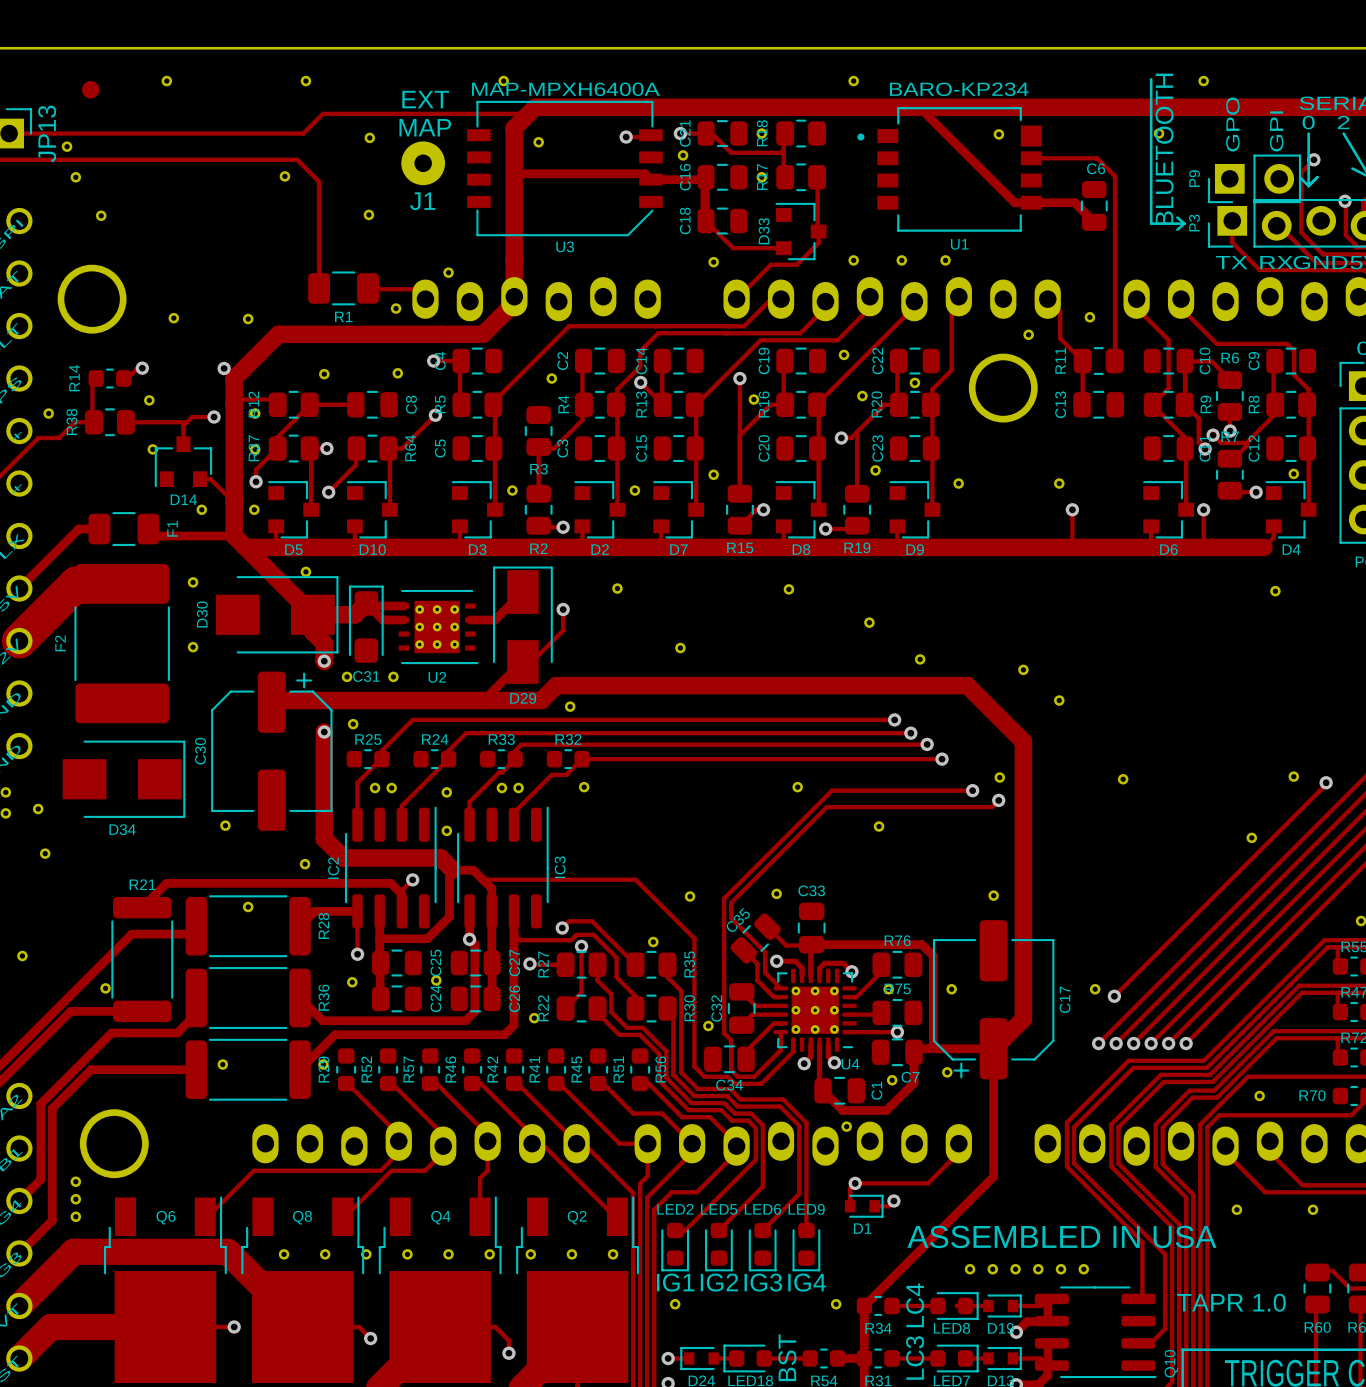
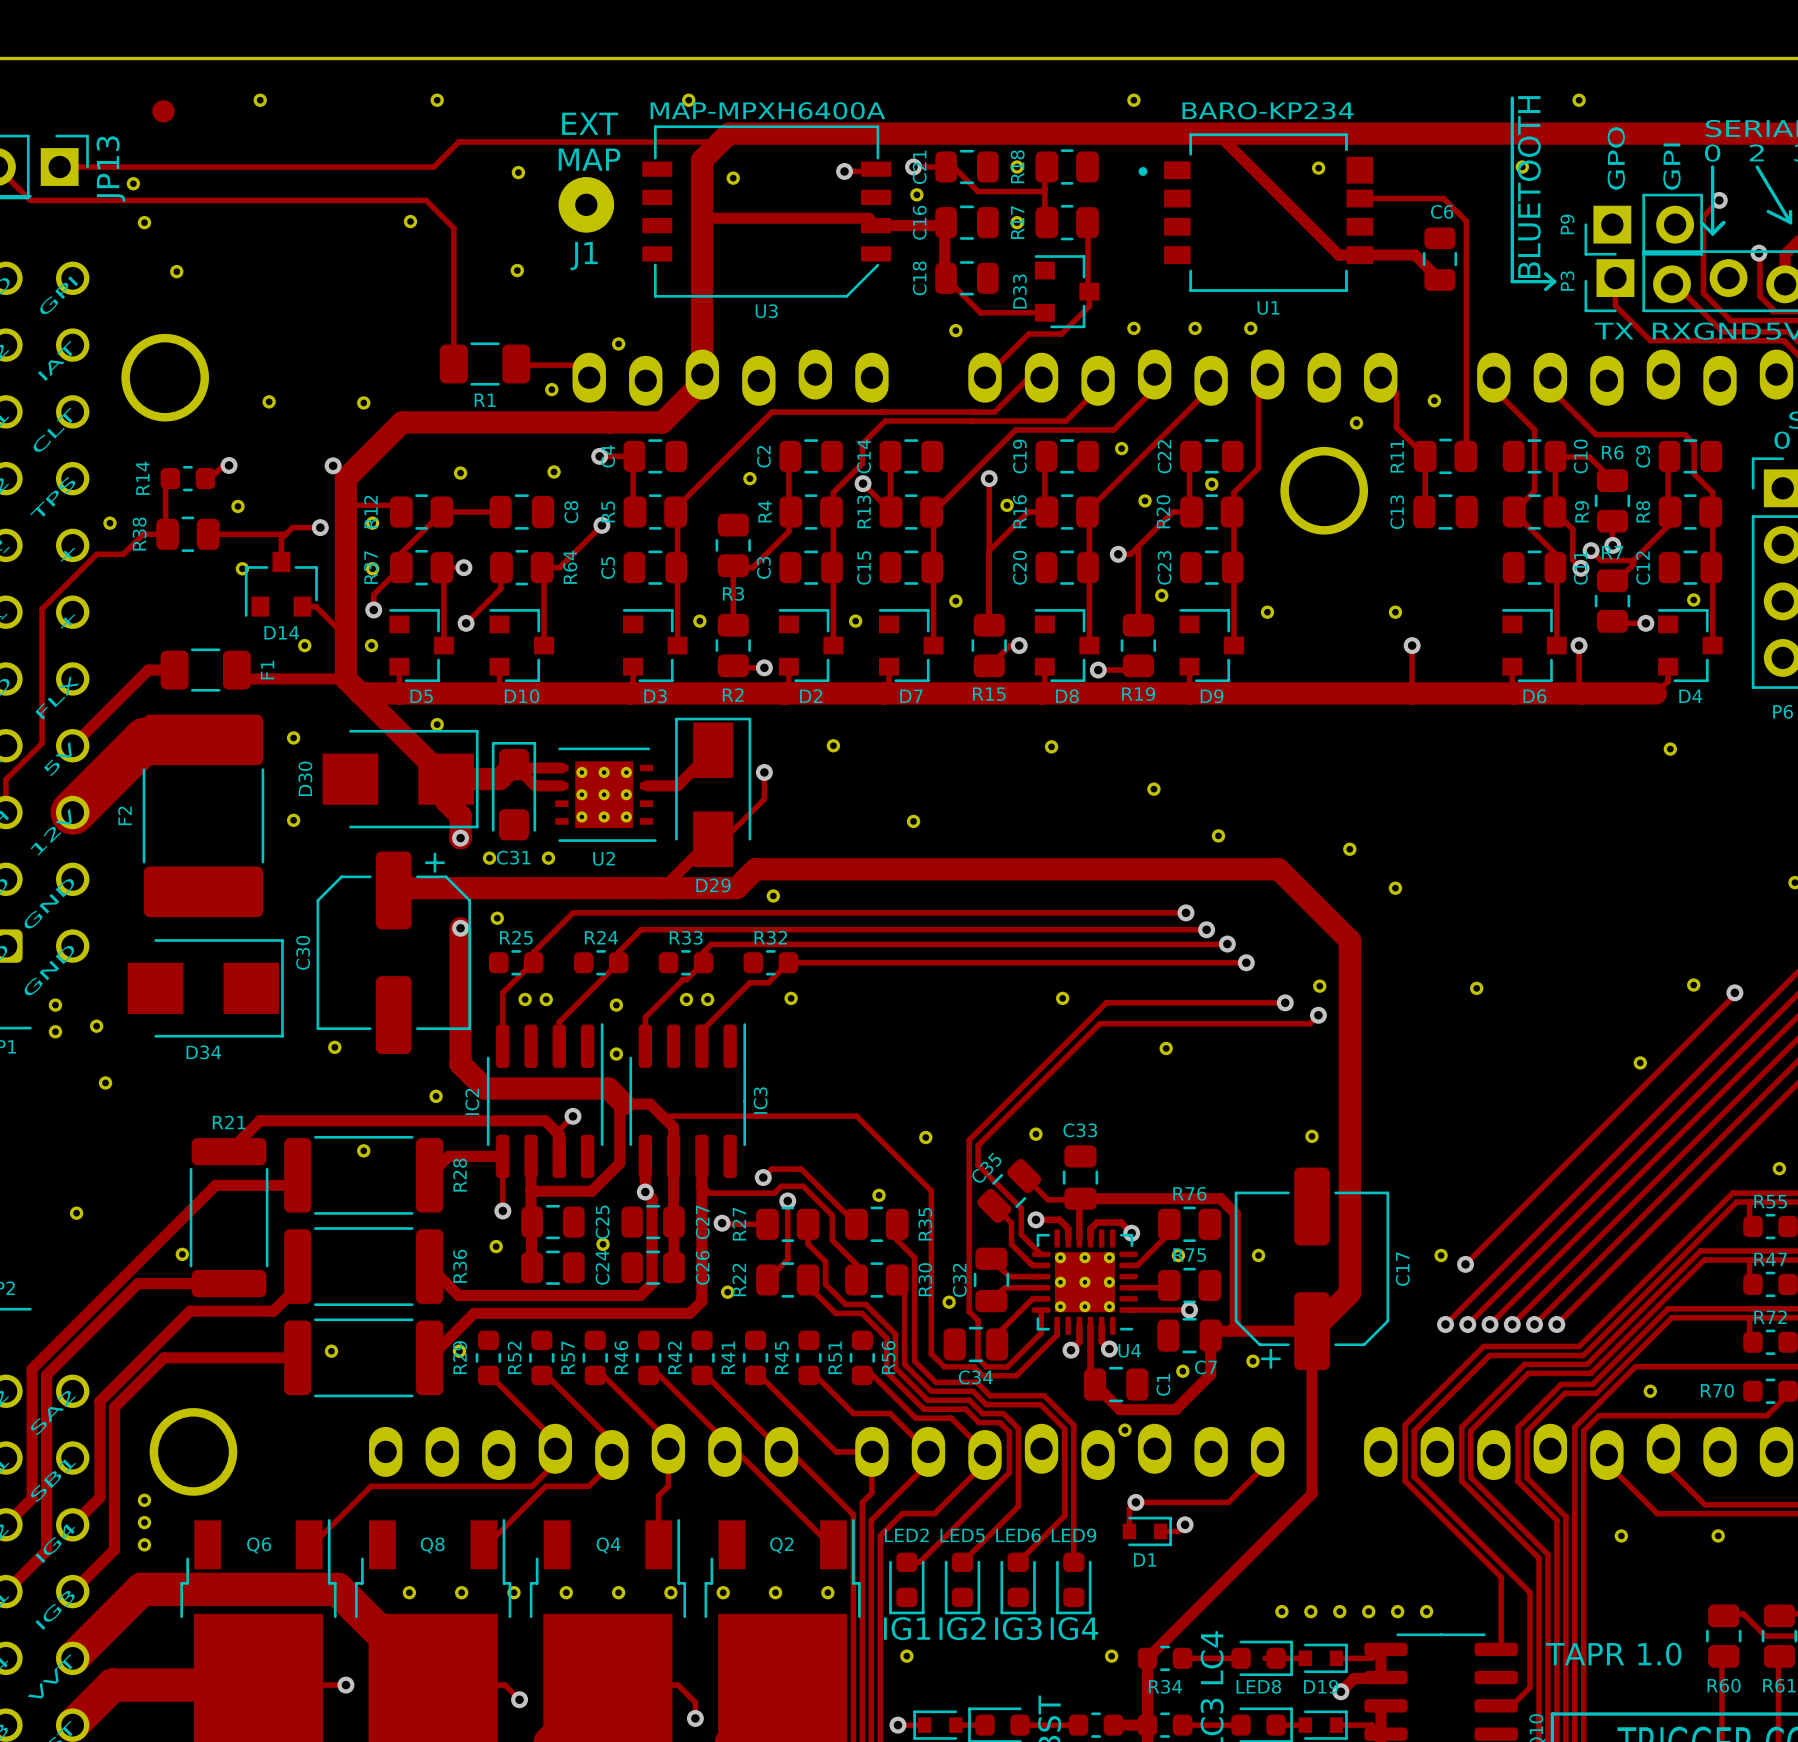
text: ASSEMBLED IN USA (1061, 1236) -> none

